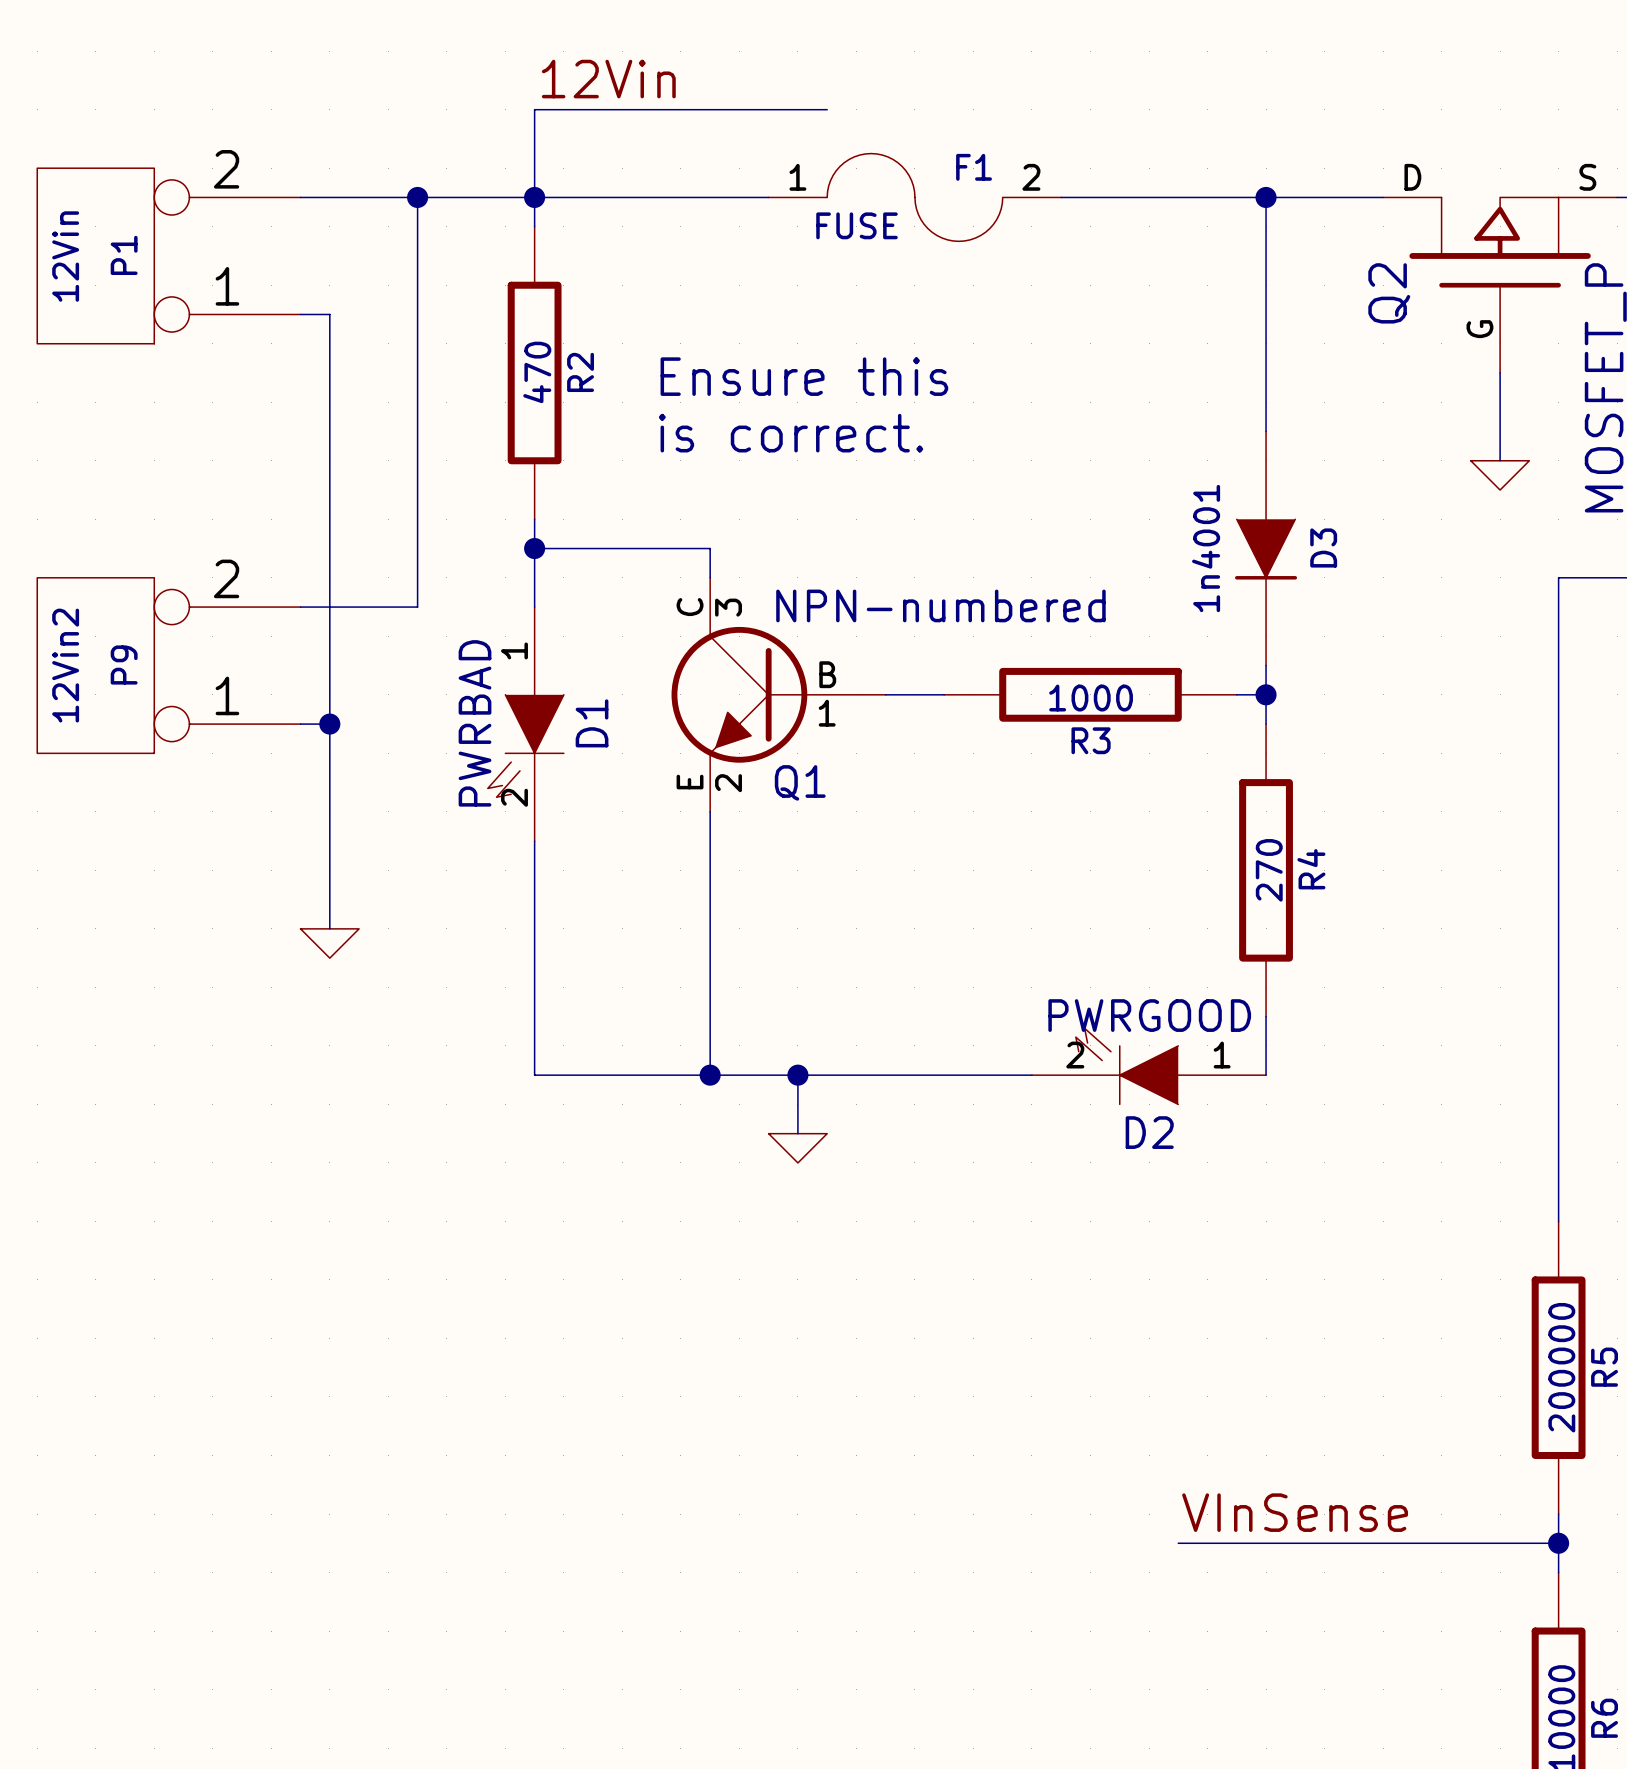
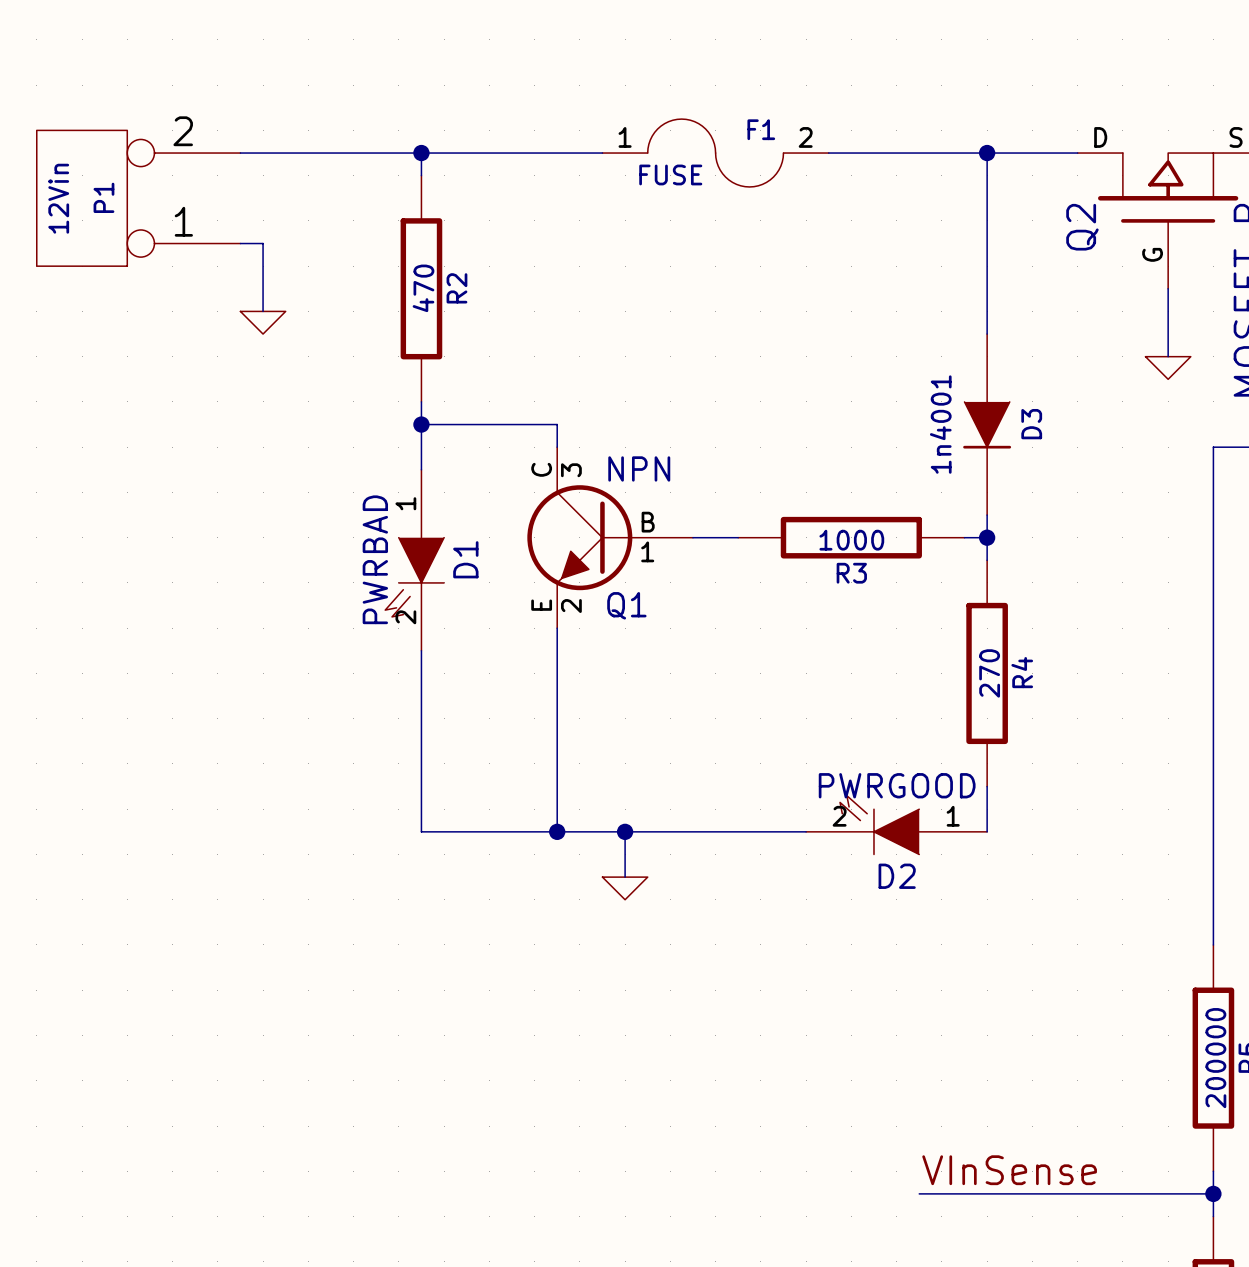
label: 12Vin (608, 79) -> none
wire: (827, 109) (534, 109) (534, 197) -> none
wire: (417, 197) (417, 607) (300, 607) -> none
junction: (417, 197) -> none
text: Ensure this (804, 376) -> none
wire: (329, 402) (329, 928) -> none
text: is correct. (791, 433) -> none
Q1 value: NPN-numbered (940, 605) -> NPN (639, 468)
P9: 12Vin2 (168, 665) -> none
wire: (300, 724) (329, 724) -> none
junction: (329, 724) -> none
power symbol position: (329, 943) -> (263, 322)

